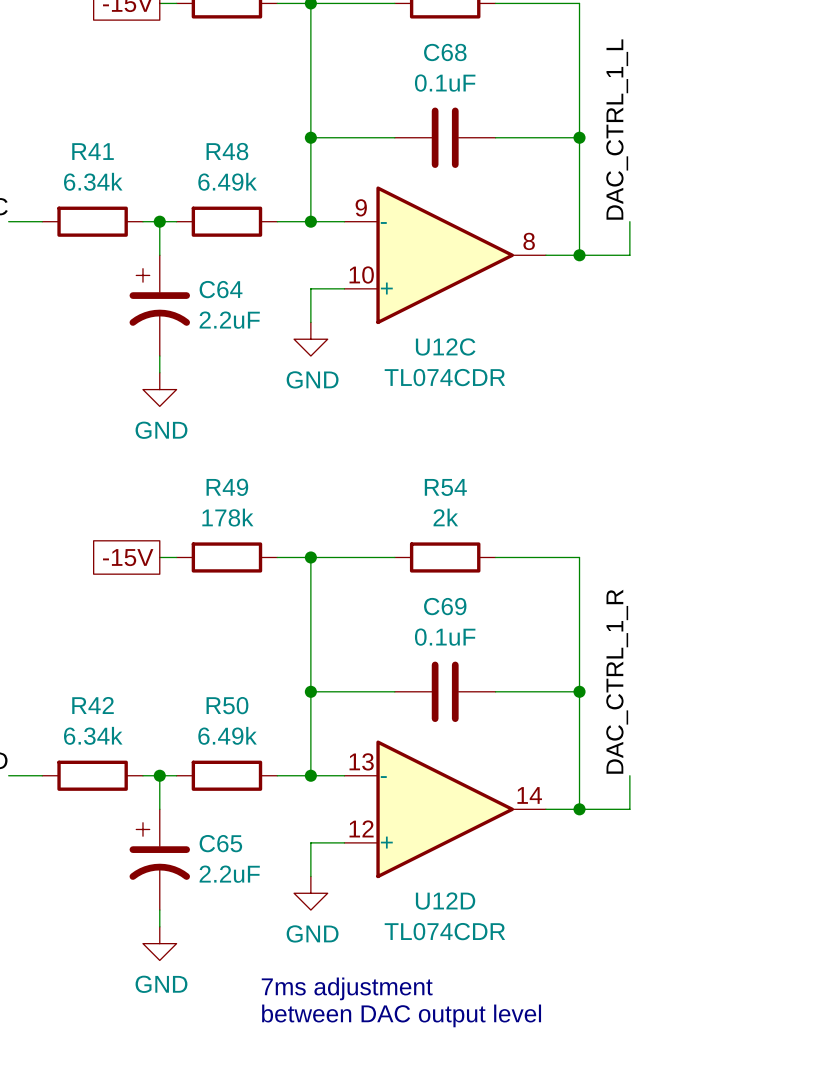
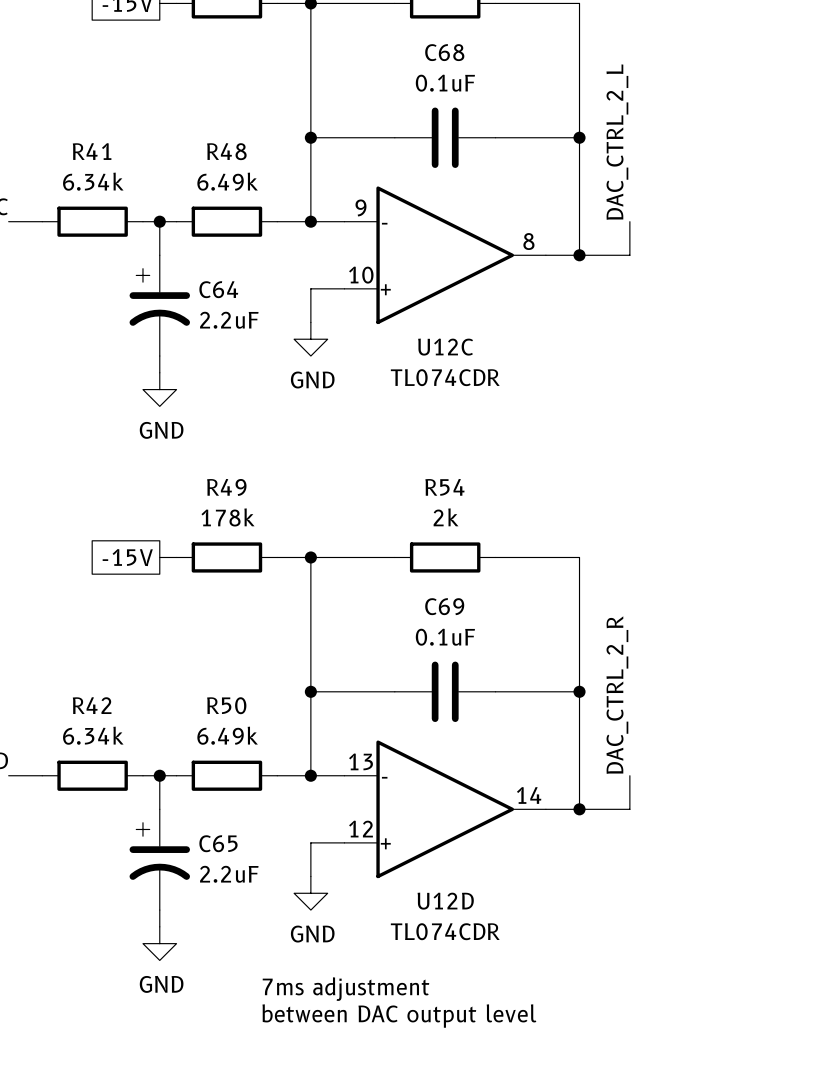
label: DAC_CTRL_1_L (617, 129) -> DAC_CTRL_2_L (617, 142)
label: DAC_CTRL_1_R (617, 681) -> DAC_CTRL_2_R (617, 695)

